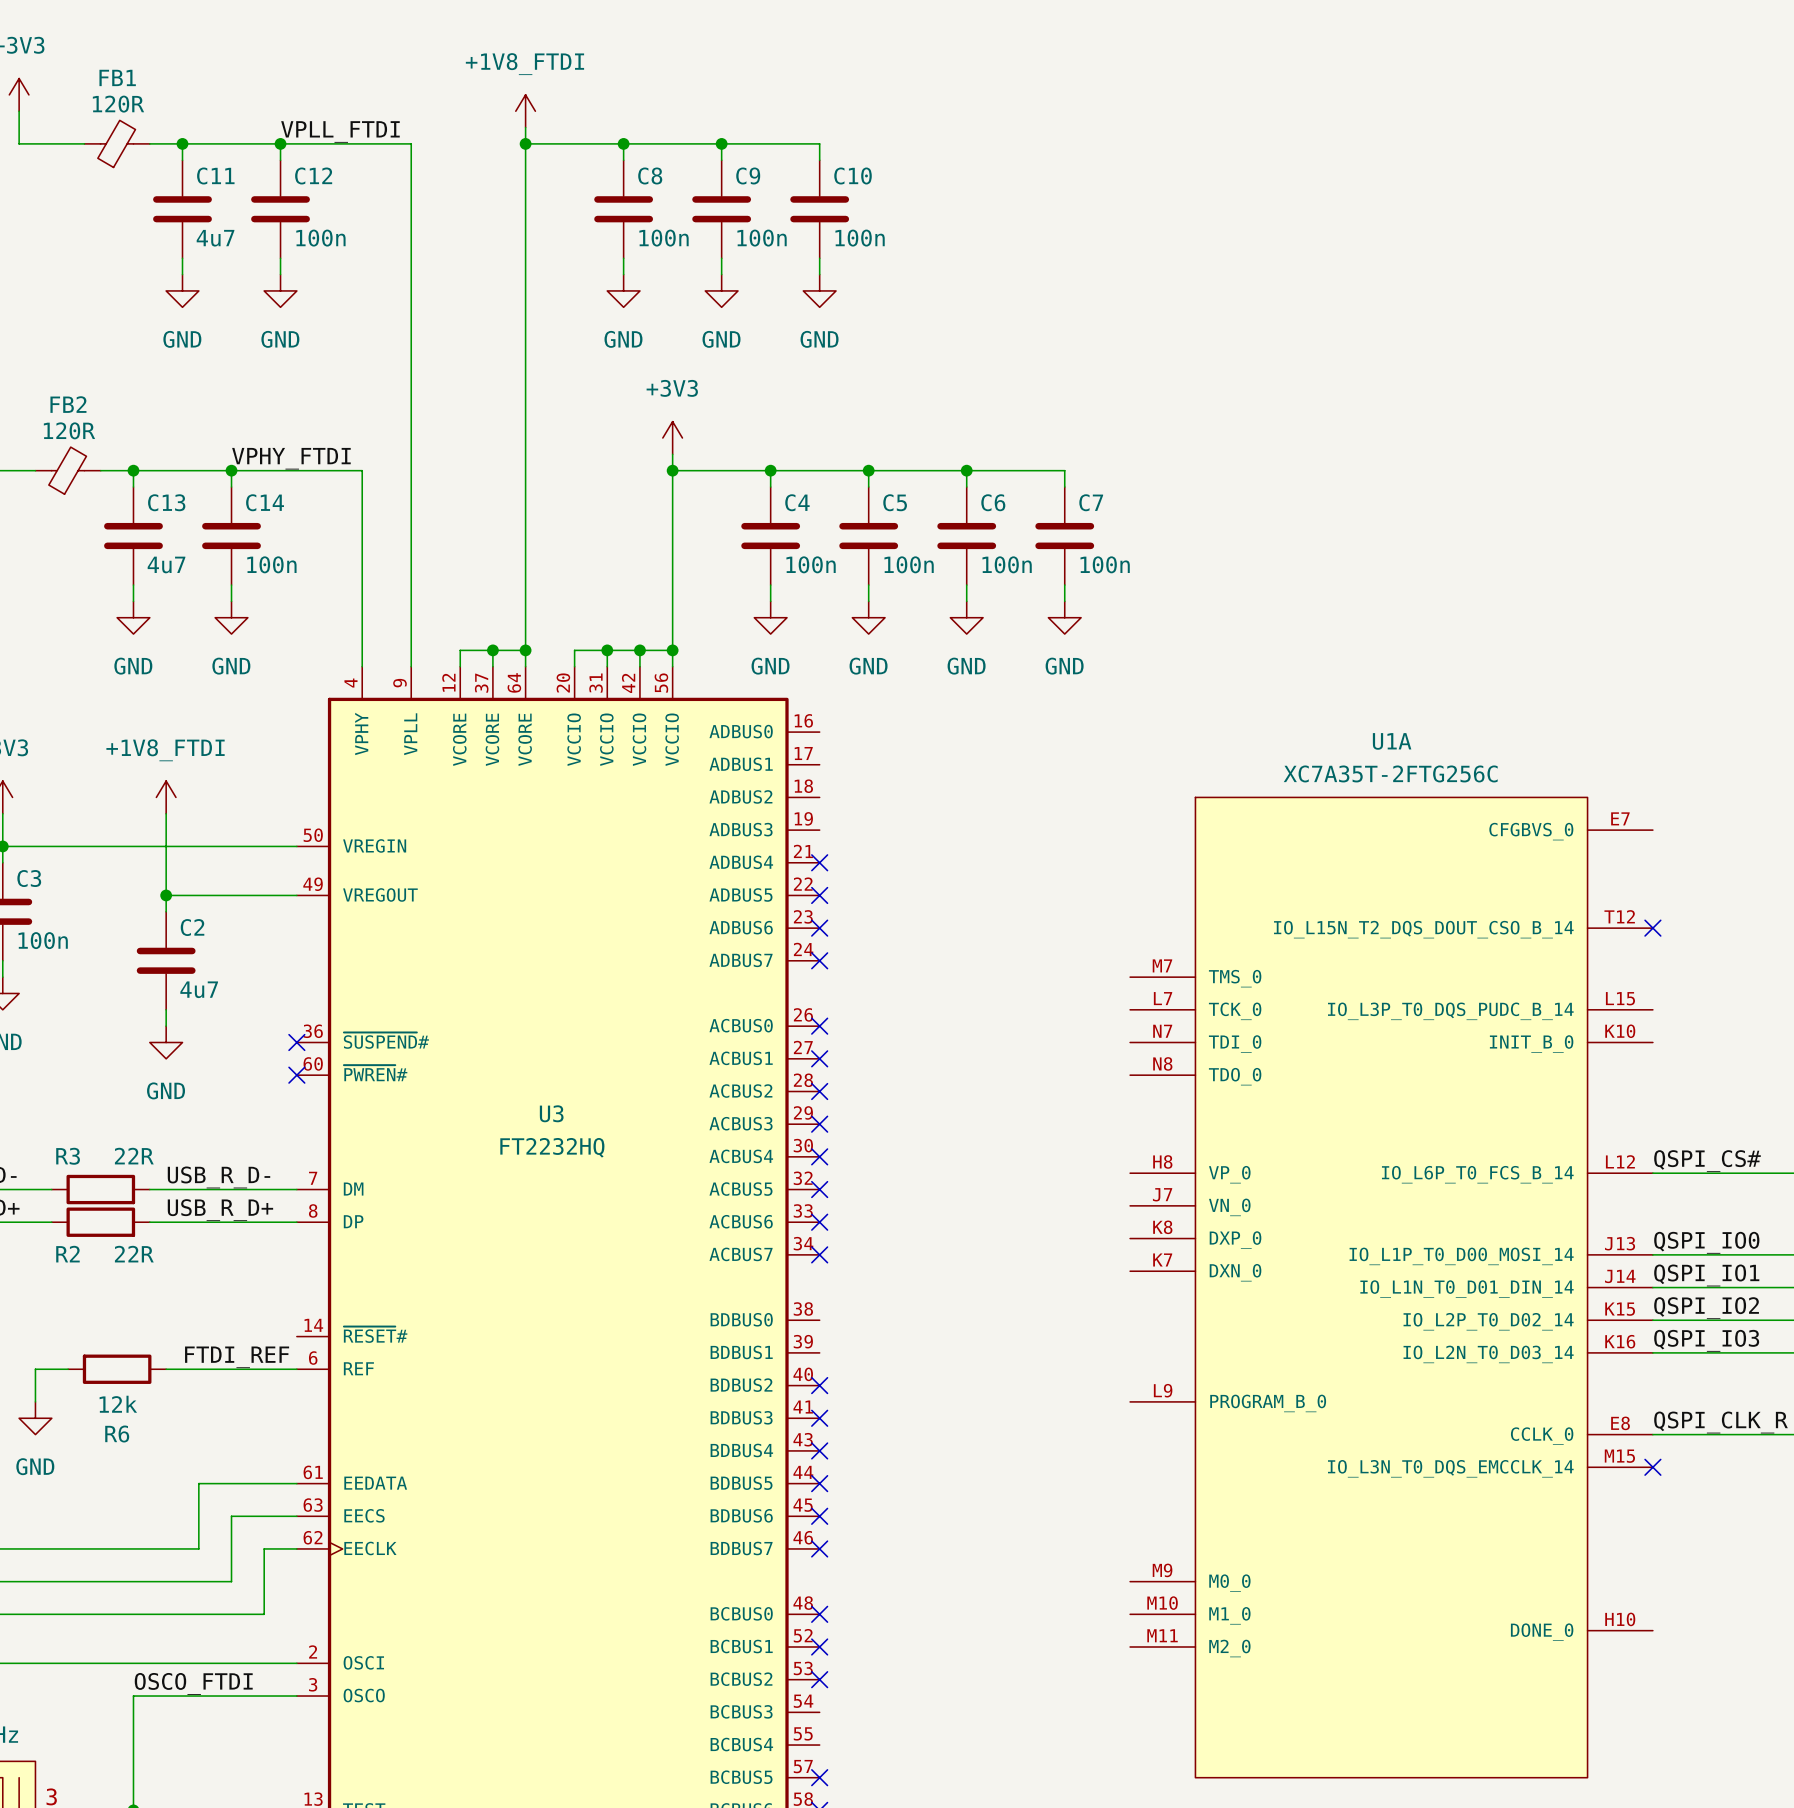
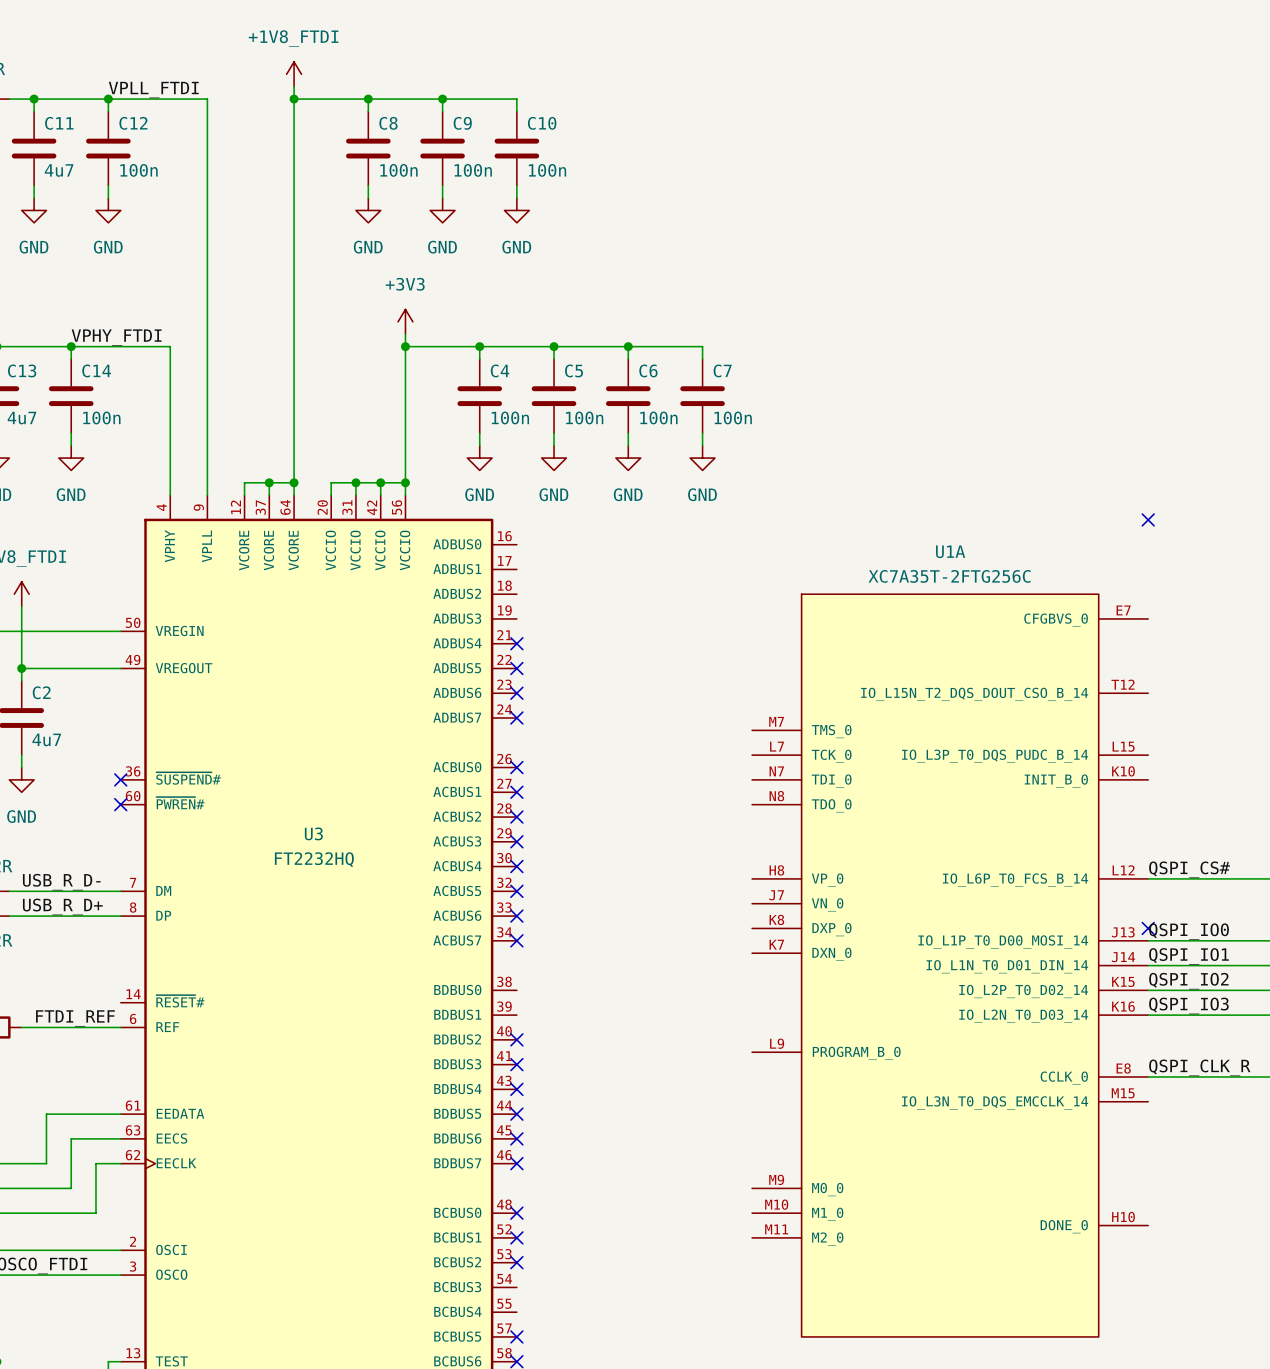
no-connect mark: none -> (1148, 519)
no-connect mark: (1652, 928) -> none
no-connect mark: none -> (1148, 928)
no-connect mark: (1652, 1467) -> none

